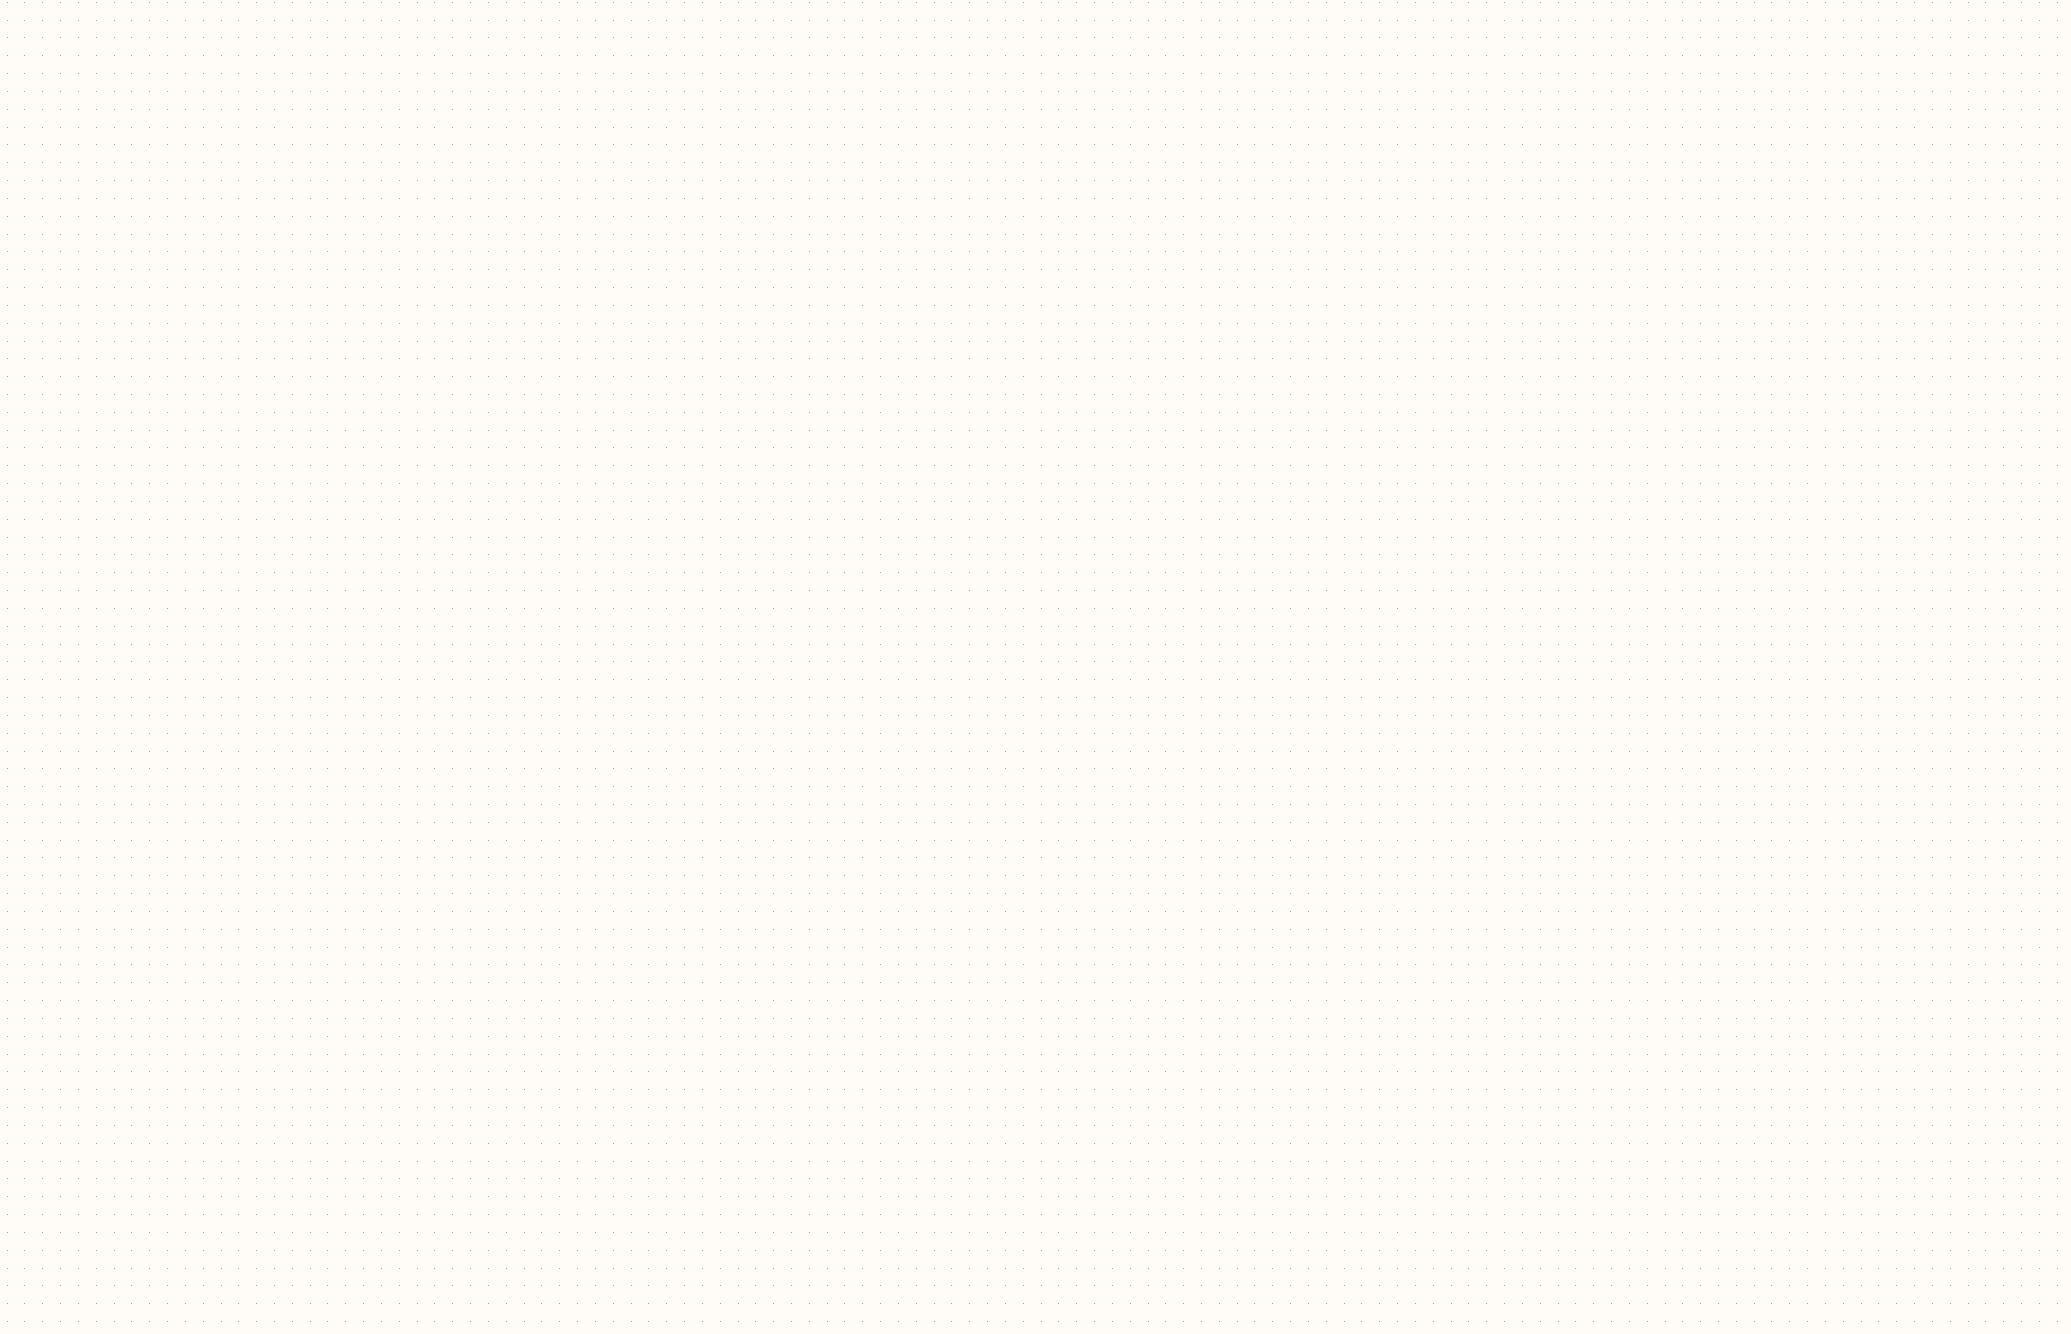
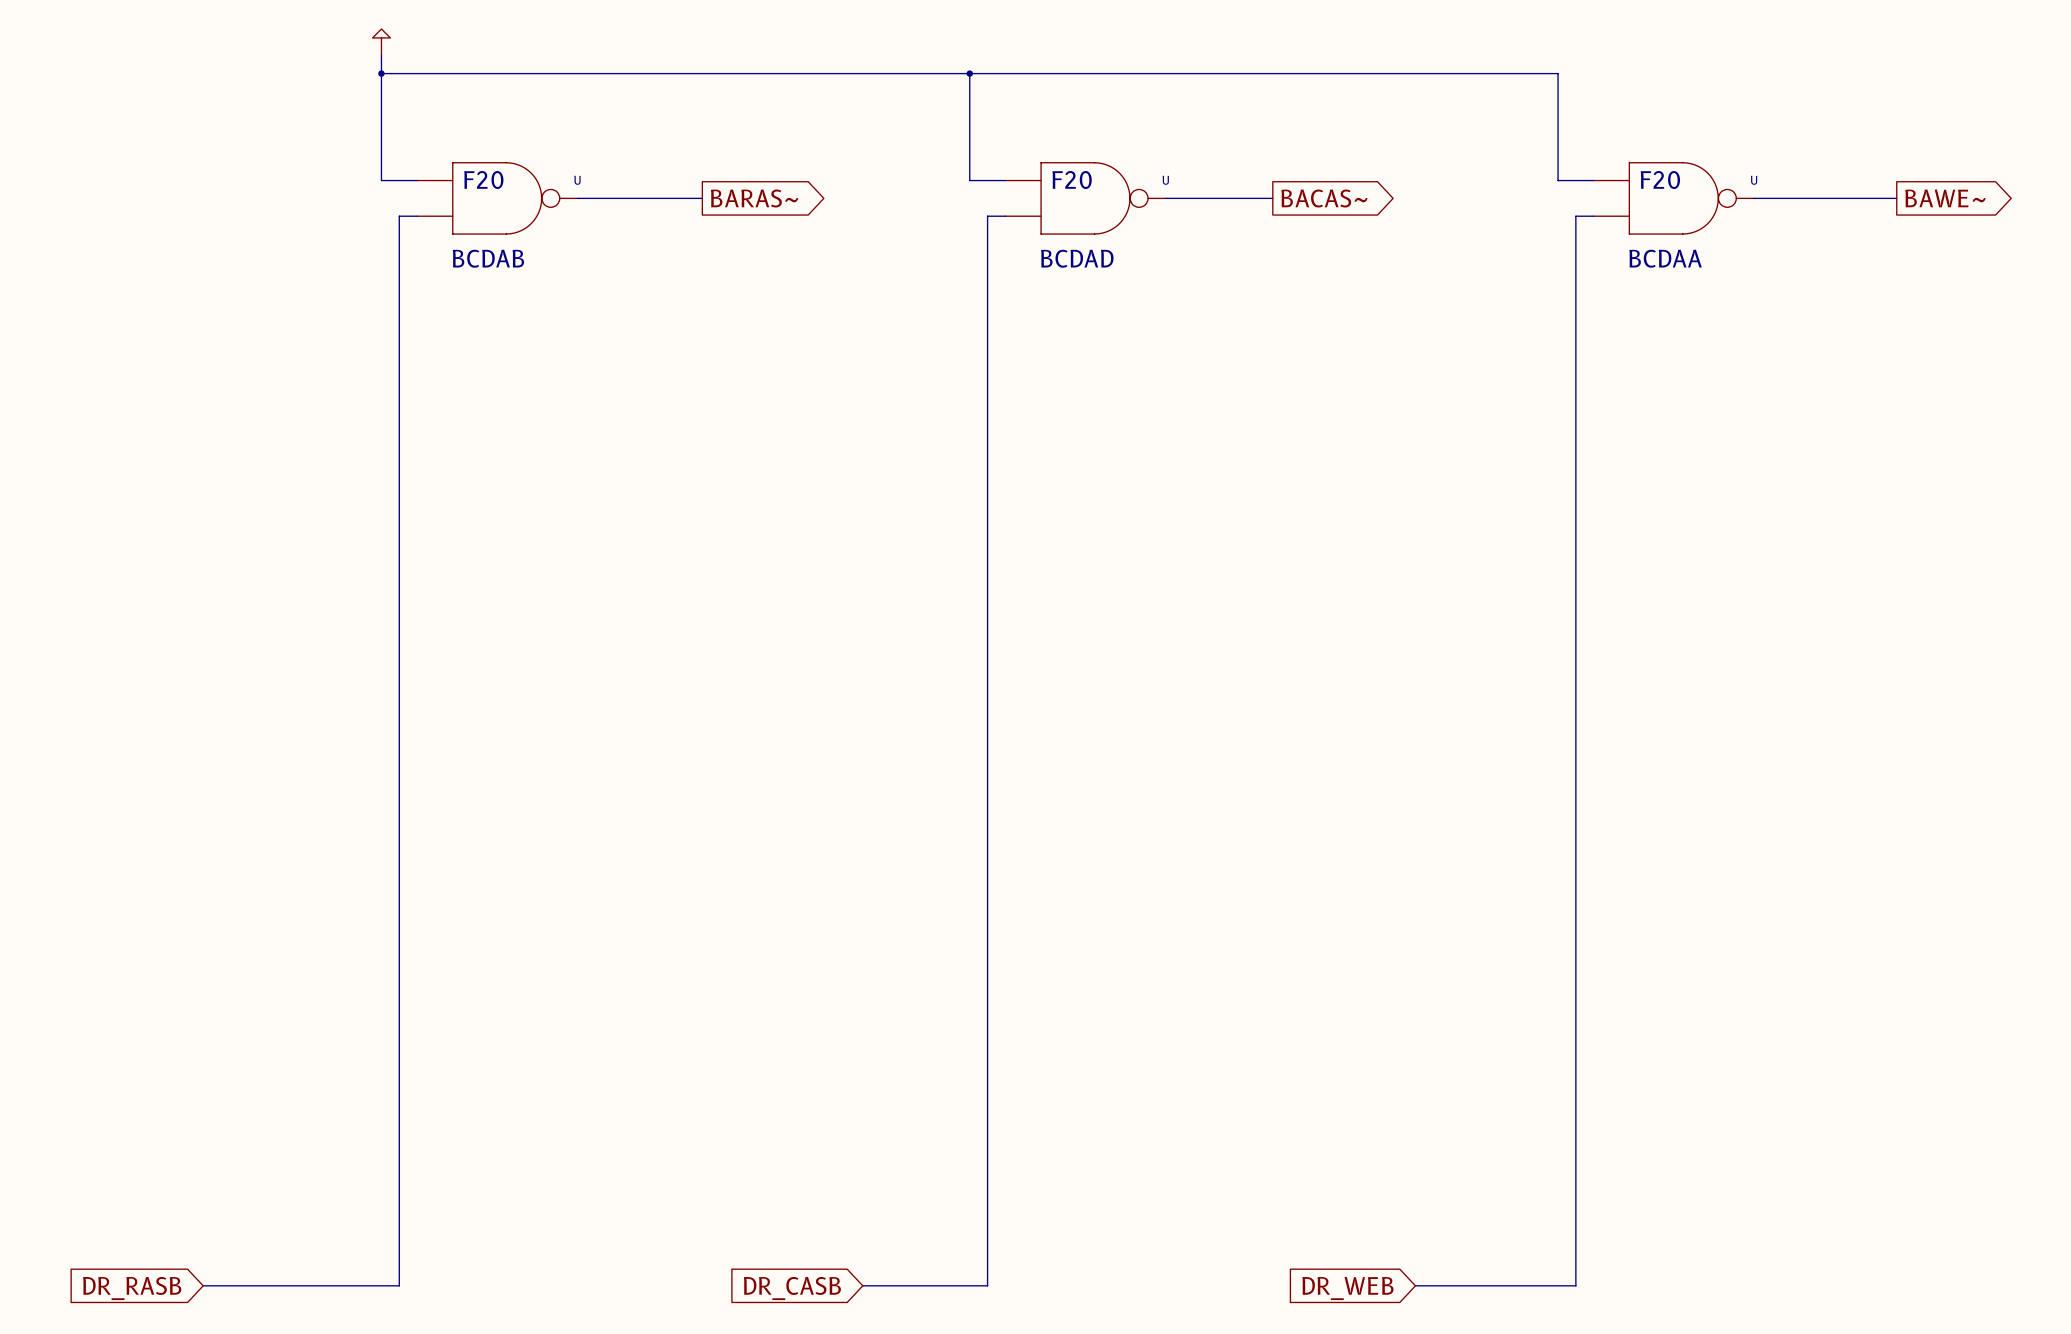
power symbol: none -> (381, 42)
wire: none -> (381, 55) (381, 180) (417, 180)
wire: none -> (381, 73) (1558, 73) (1558, 180) (1593, 180)
junction: none -> (381, 73)
wire: none -> (969, 73) (969, 180) (1005, 180)
junction: none -> (969, 73)
U: none -> (497, 198)
wire: none -> (577, 198) (702, 198)
global label: none -> BARAS~ (754, 198)
U: none -> (1085, 198)
wire: none -> (1165, 198) (1272, 198)
global label: none -> BACAS~ (1324, 198)
U: none -> (1673, 198)
wire: none -> (1754, 198) (1896, 198)
global label: none -> BAWE~ (1945, 198)
wire: none -> (417, 216) (399, 216) (399, 1285) (203, 1285)
wire: none -> (1005, 216) (987, 216) (987, 1285) (862, 1285)
wire: none -> (1593, 216) (1575, 216) (1575, 1285) (1415, 1285)
global label: none -> DR_RASB (132, 1288)
global label: none -> DR_CASB (792, 1288)
global label: none -> DR_WEB (1347, 1288)

